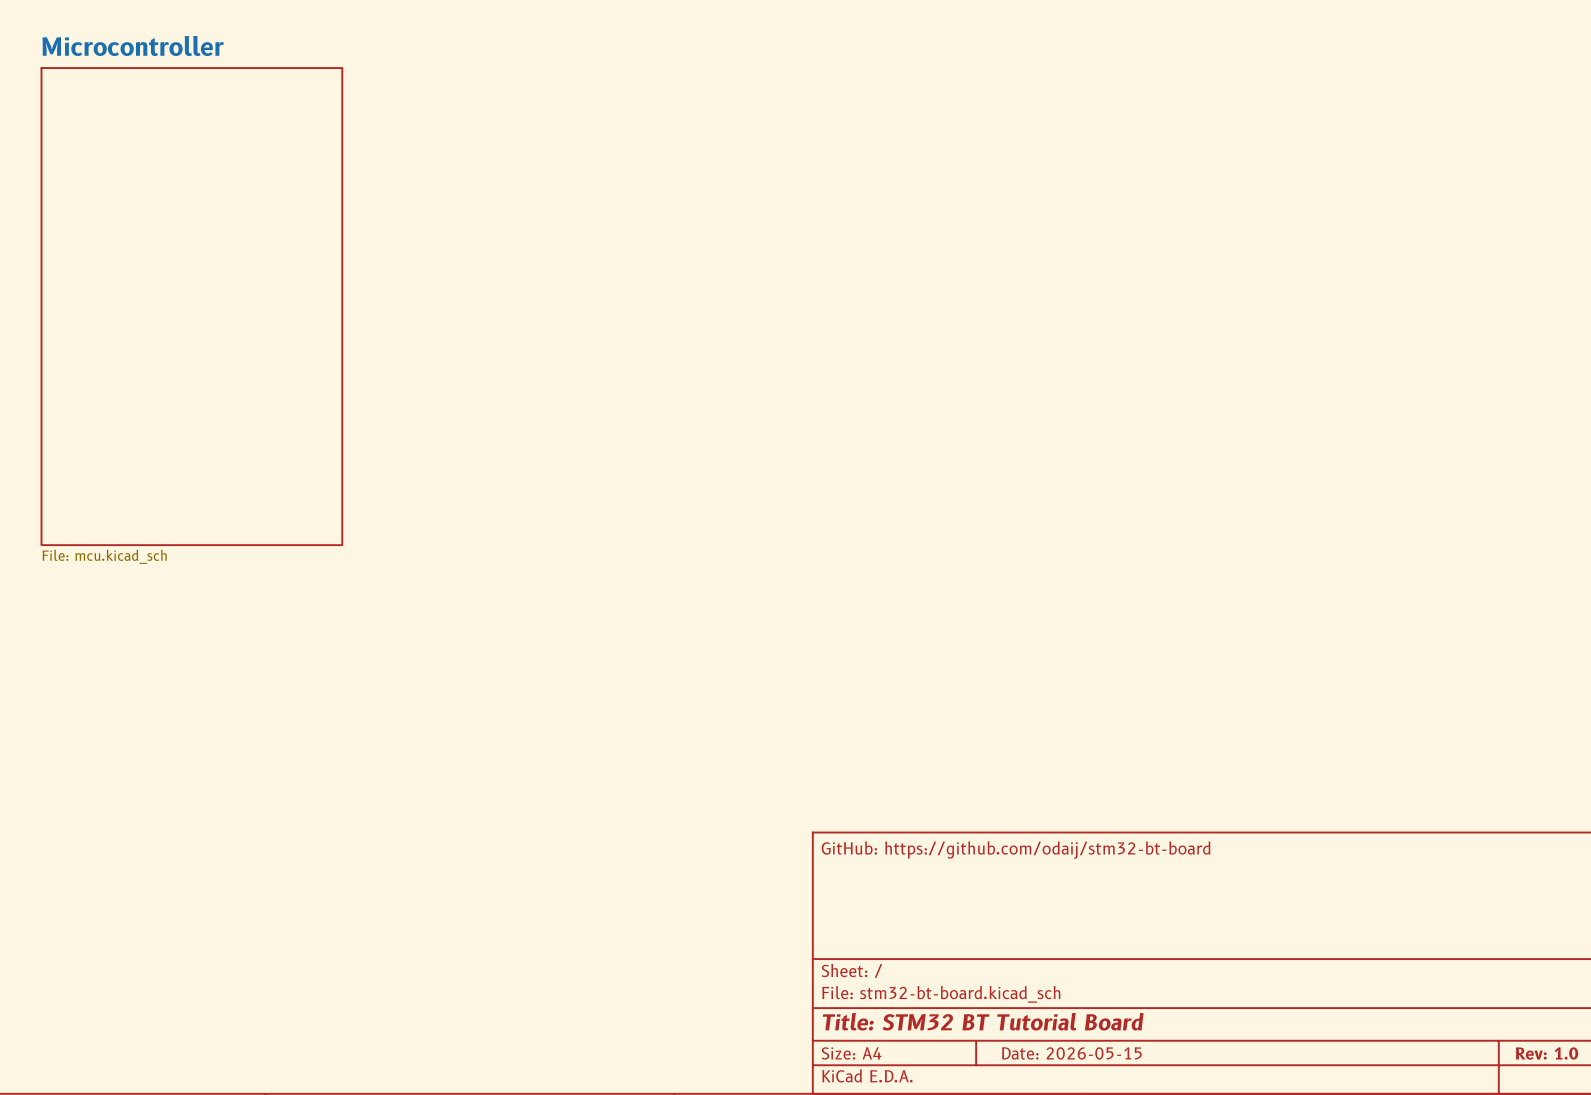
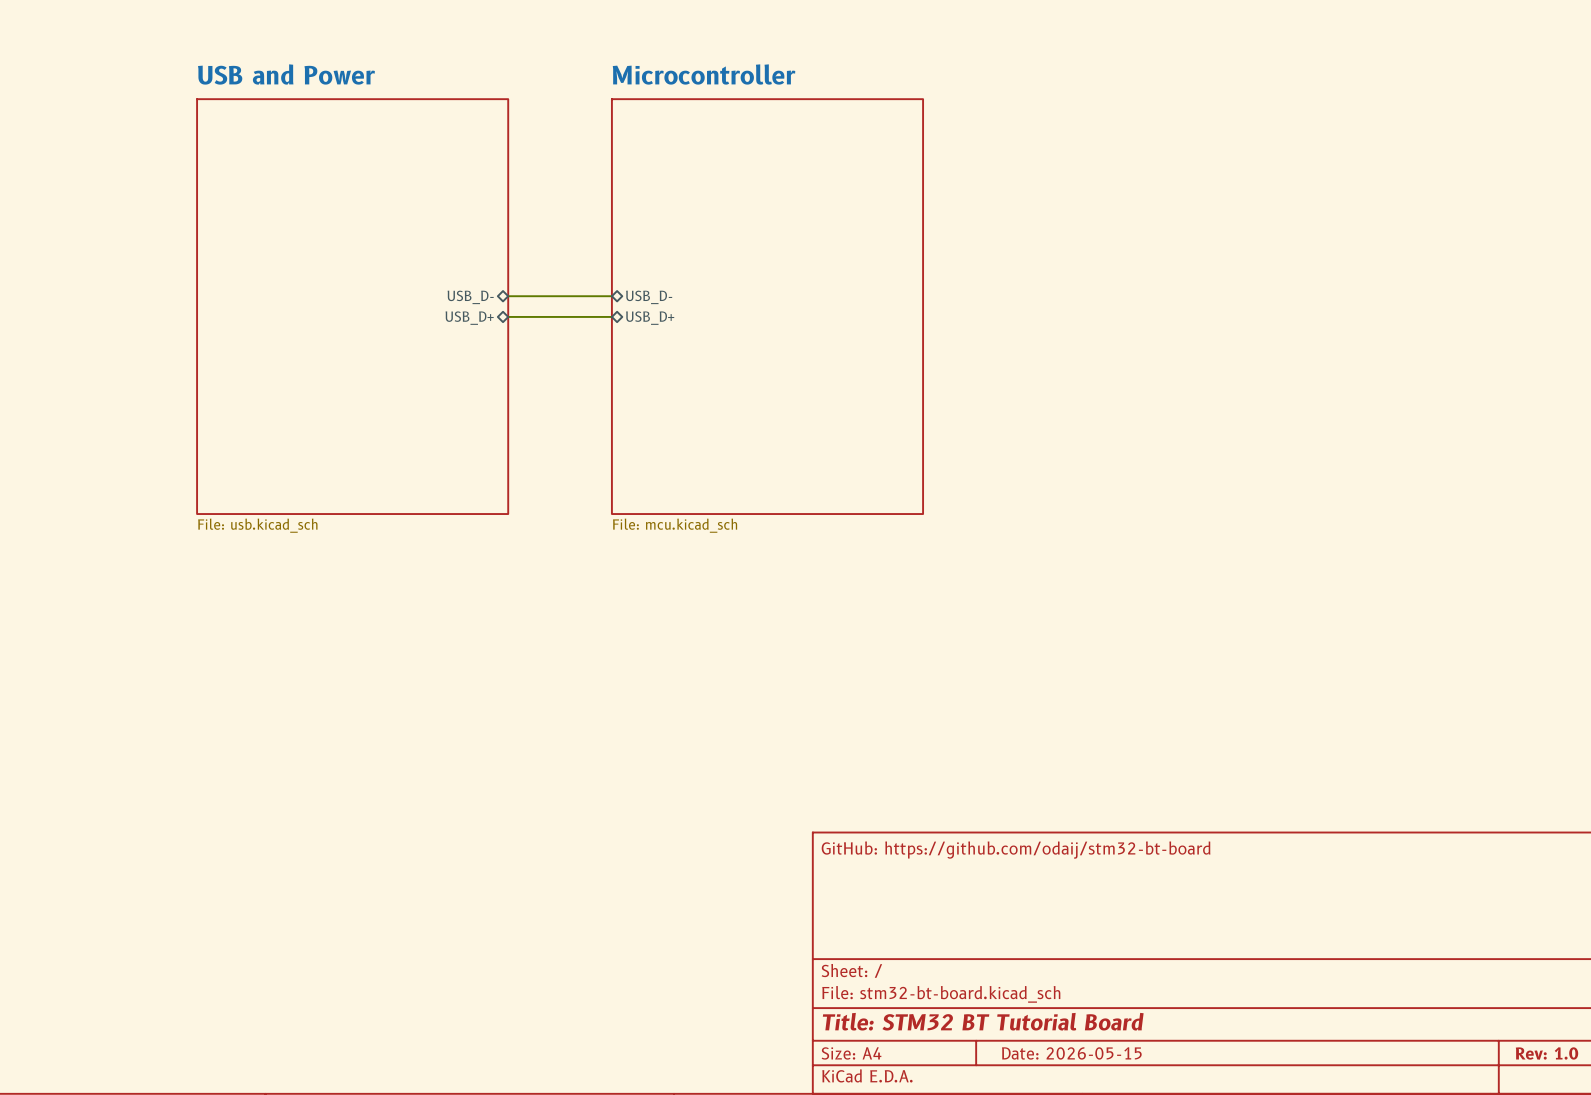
wire: none -> (508, 296) (611, 296)
sheet pin: none -> USB_D- (470, 297)
sheet pin: none -> USB_D- (649, 297)
sheet Microcontroller: File: mcu.kicad_sch (191, 306) -> none
sheet USB and Power: none -> File: usb.kicad_sch (352, 306)
sheet Microcontroller: none -> File: mcu.kicad_sch (767, 306)
wire: none -> (508, 316) (611, 316)
sheet pin: none -> USB_D+ (469, 318)
sheet pin: none -> USB_D+ (650, 318)

